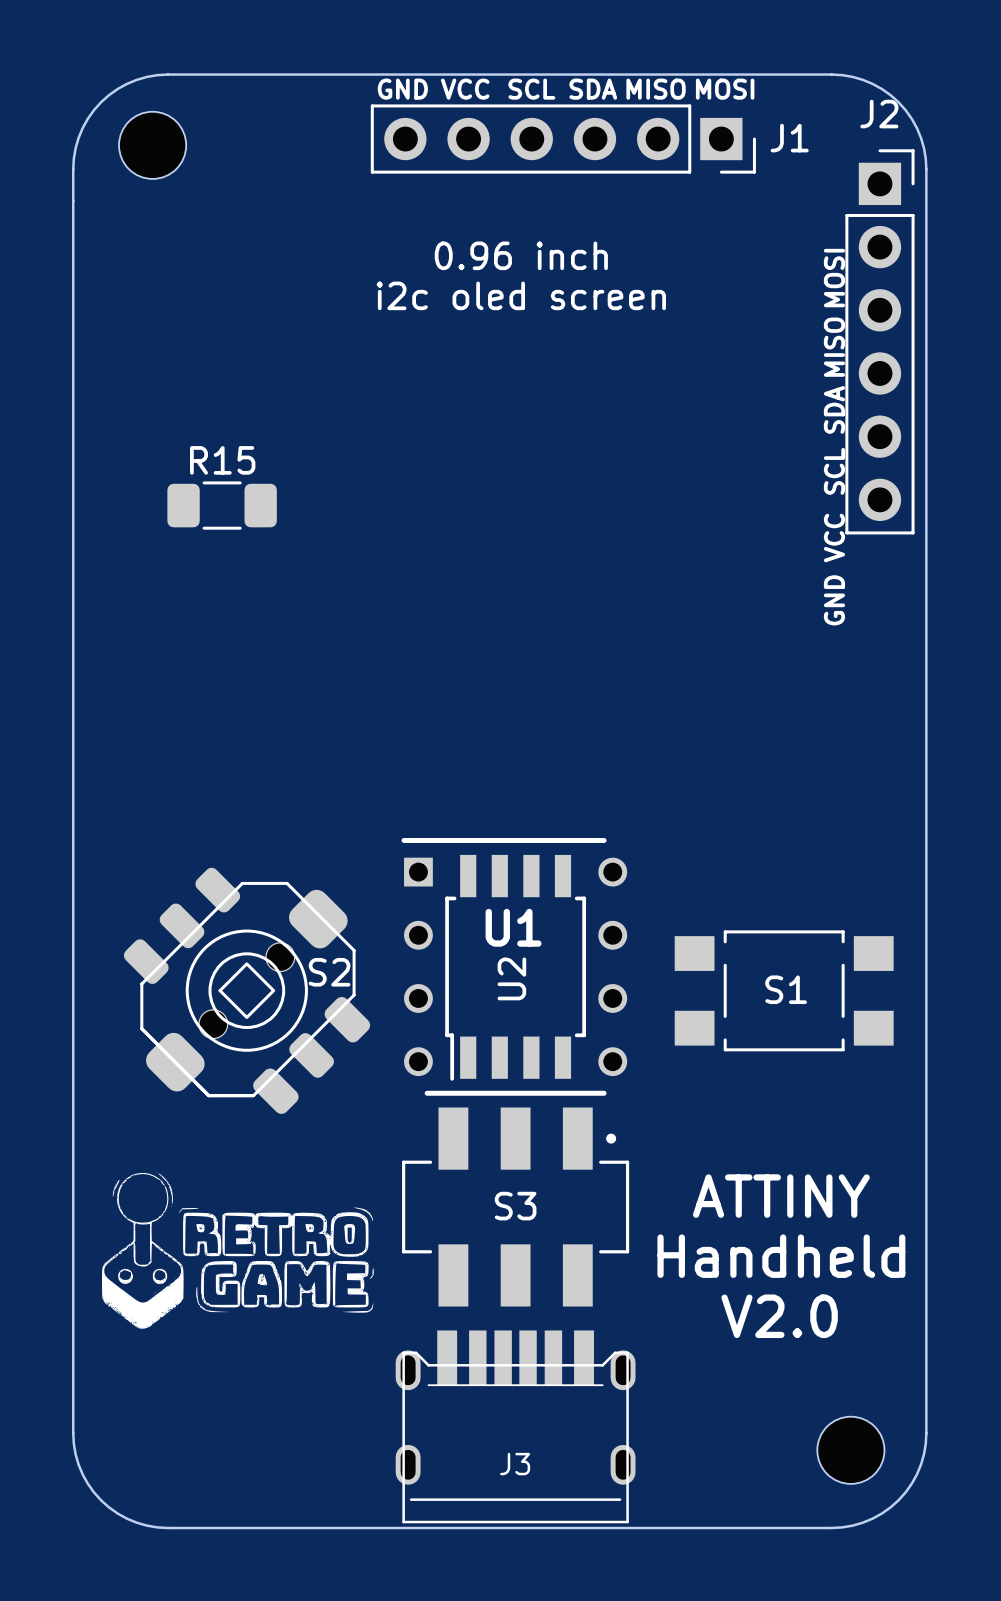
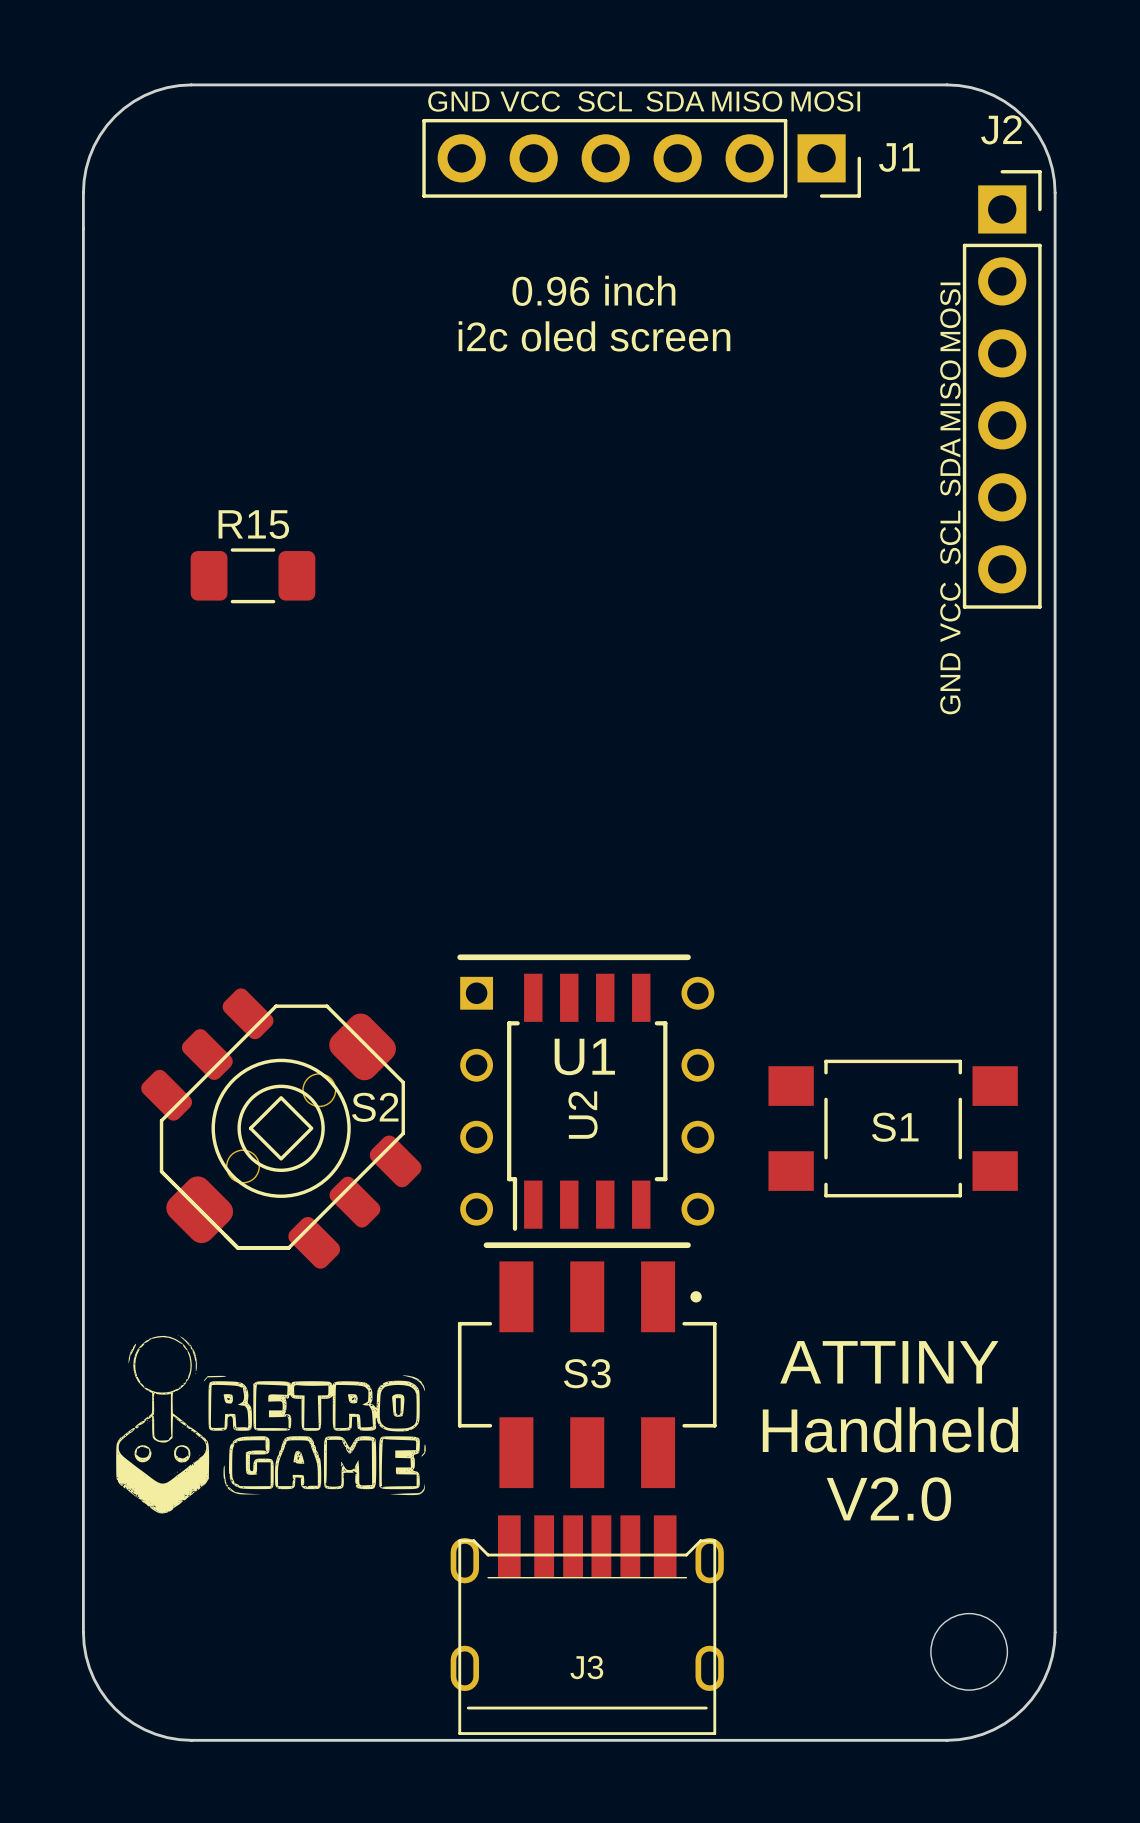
part: (152, 145) -> none

